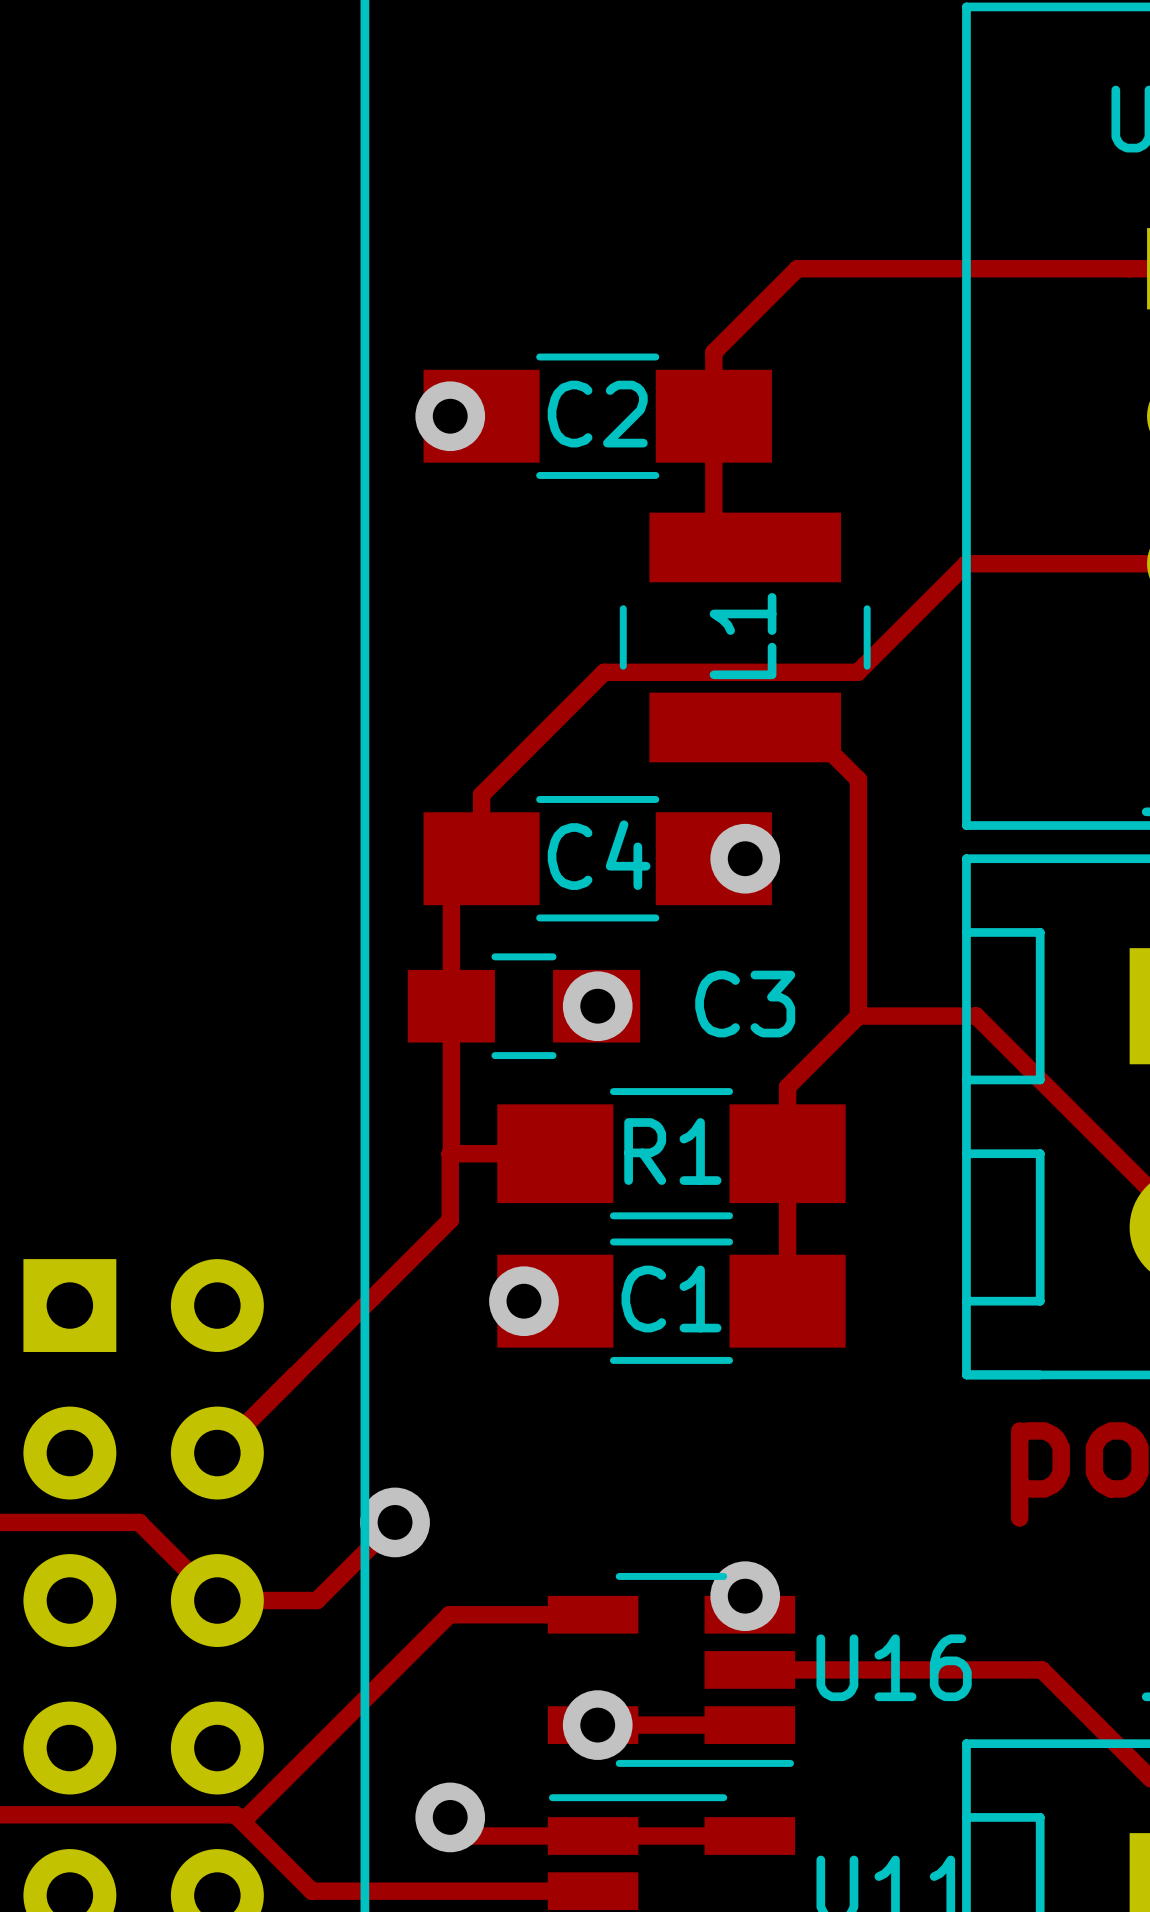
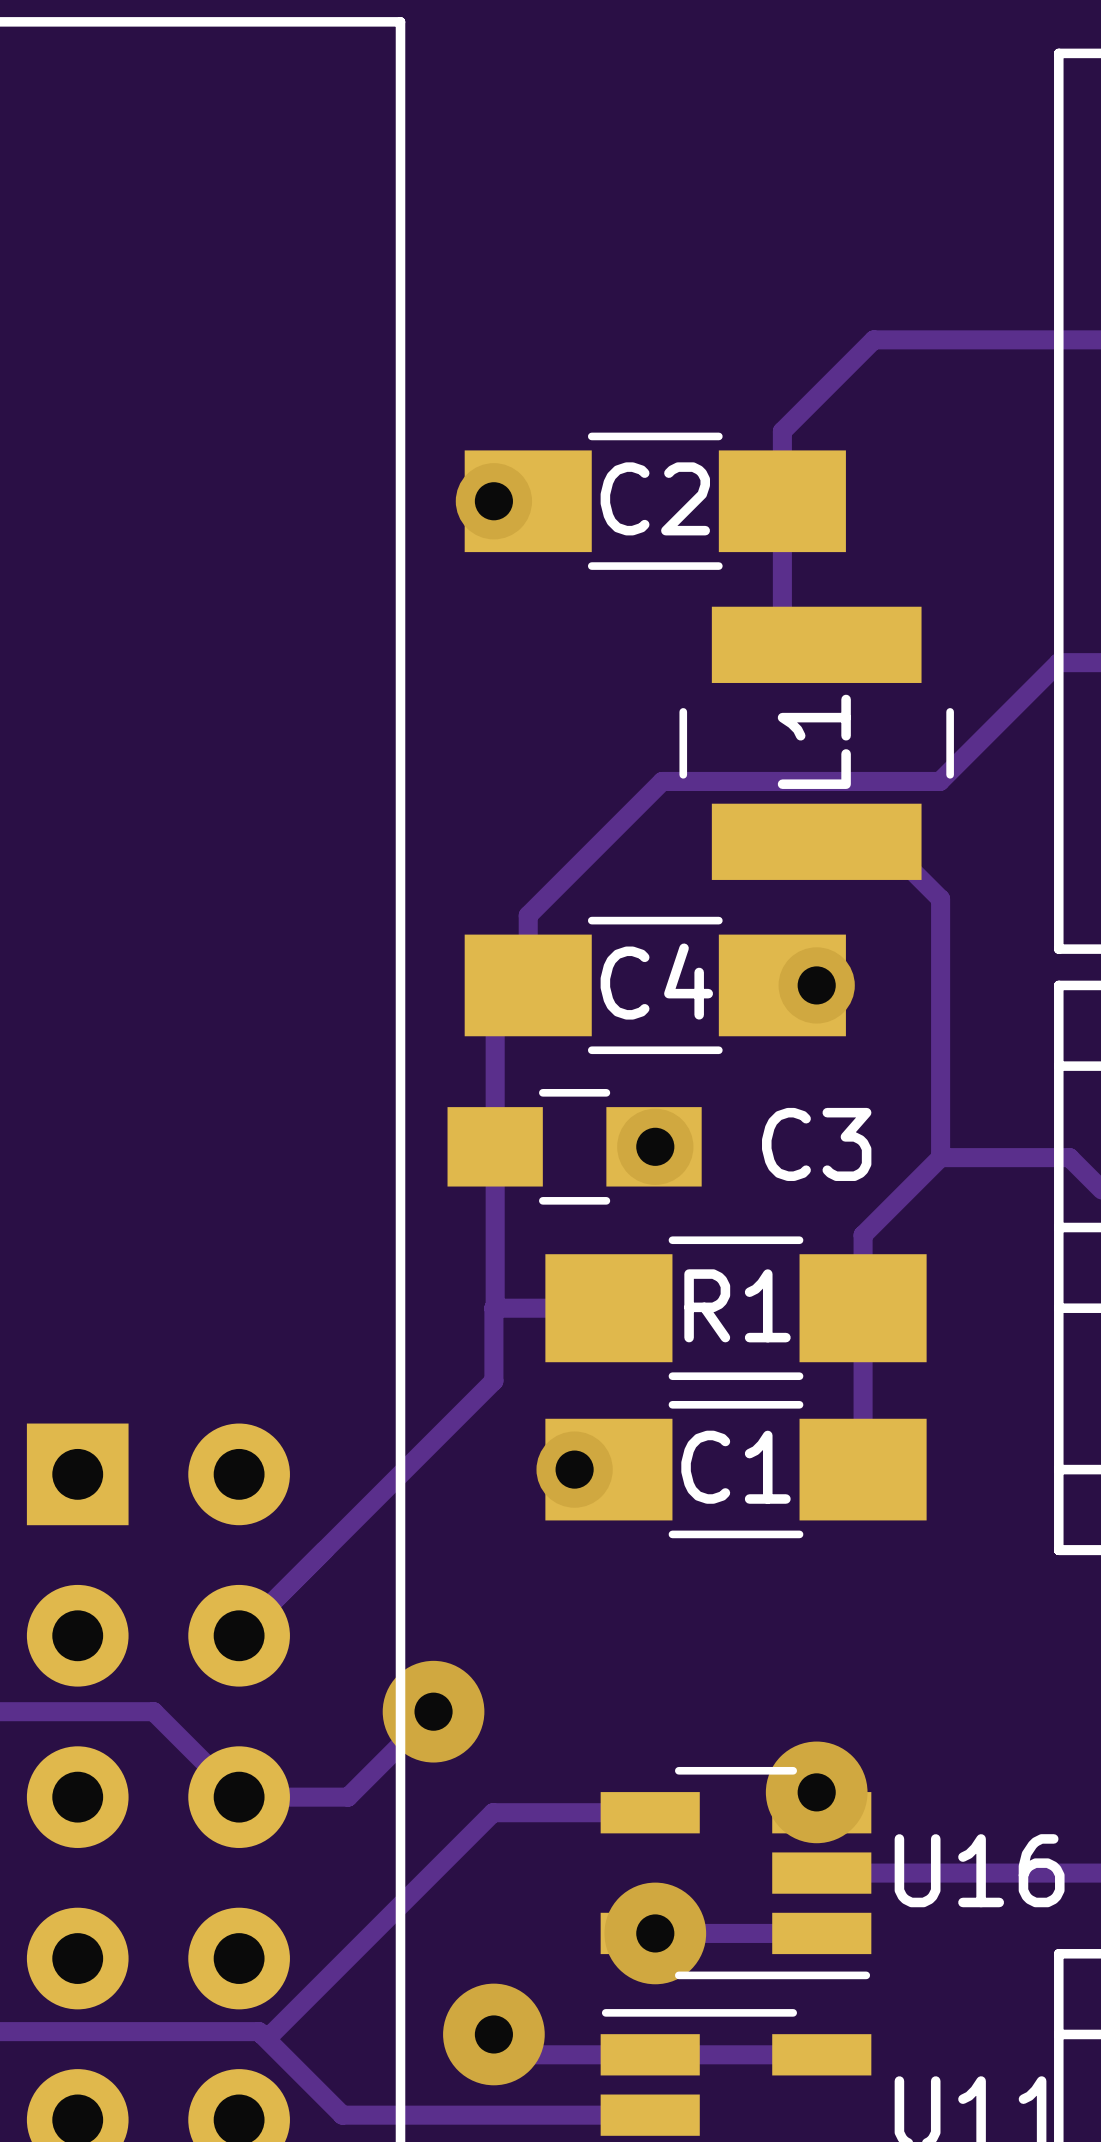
via size: [360, 1487, 430, 1558] -> [382, 1660, 485, 1763]
via size: [710, 1561, 781, 1632] -> [765, 1741, 868, 1844]
via size: [562, 1690, 633, 1760] -> [604, 1882, 707, 1985]
via size: [415, 1782, 486, 1853] -> [443, 1983, 545, 2086]

